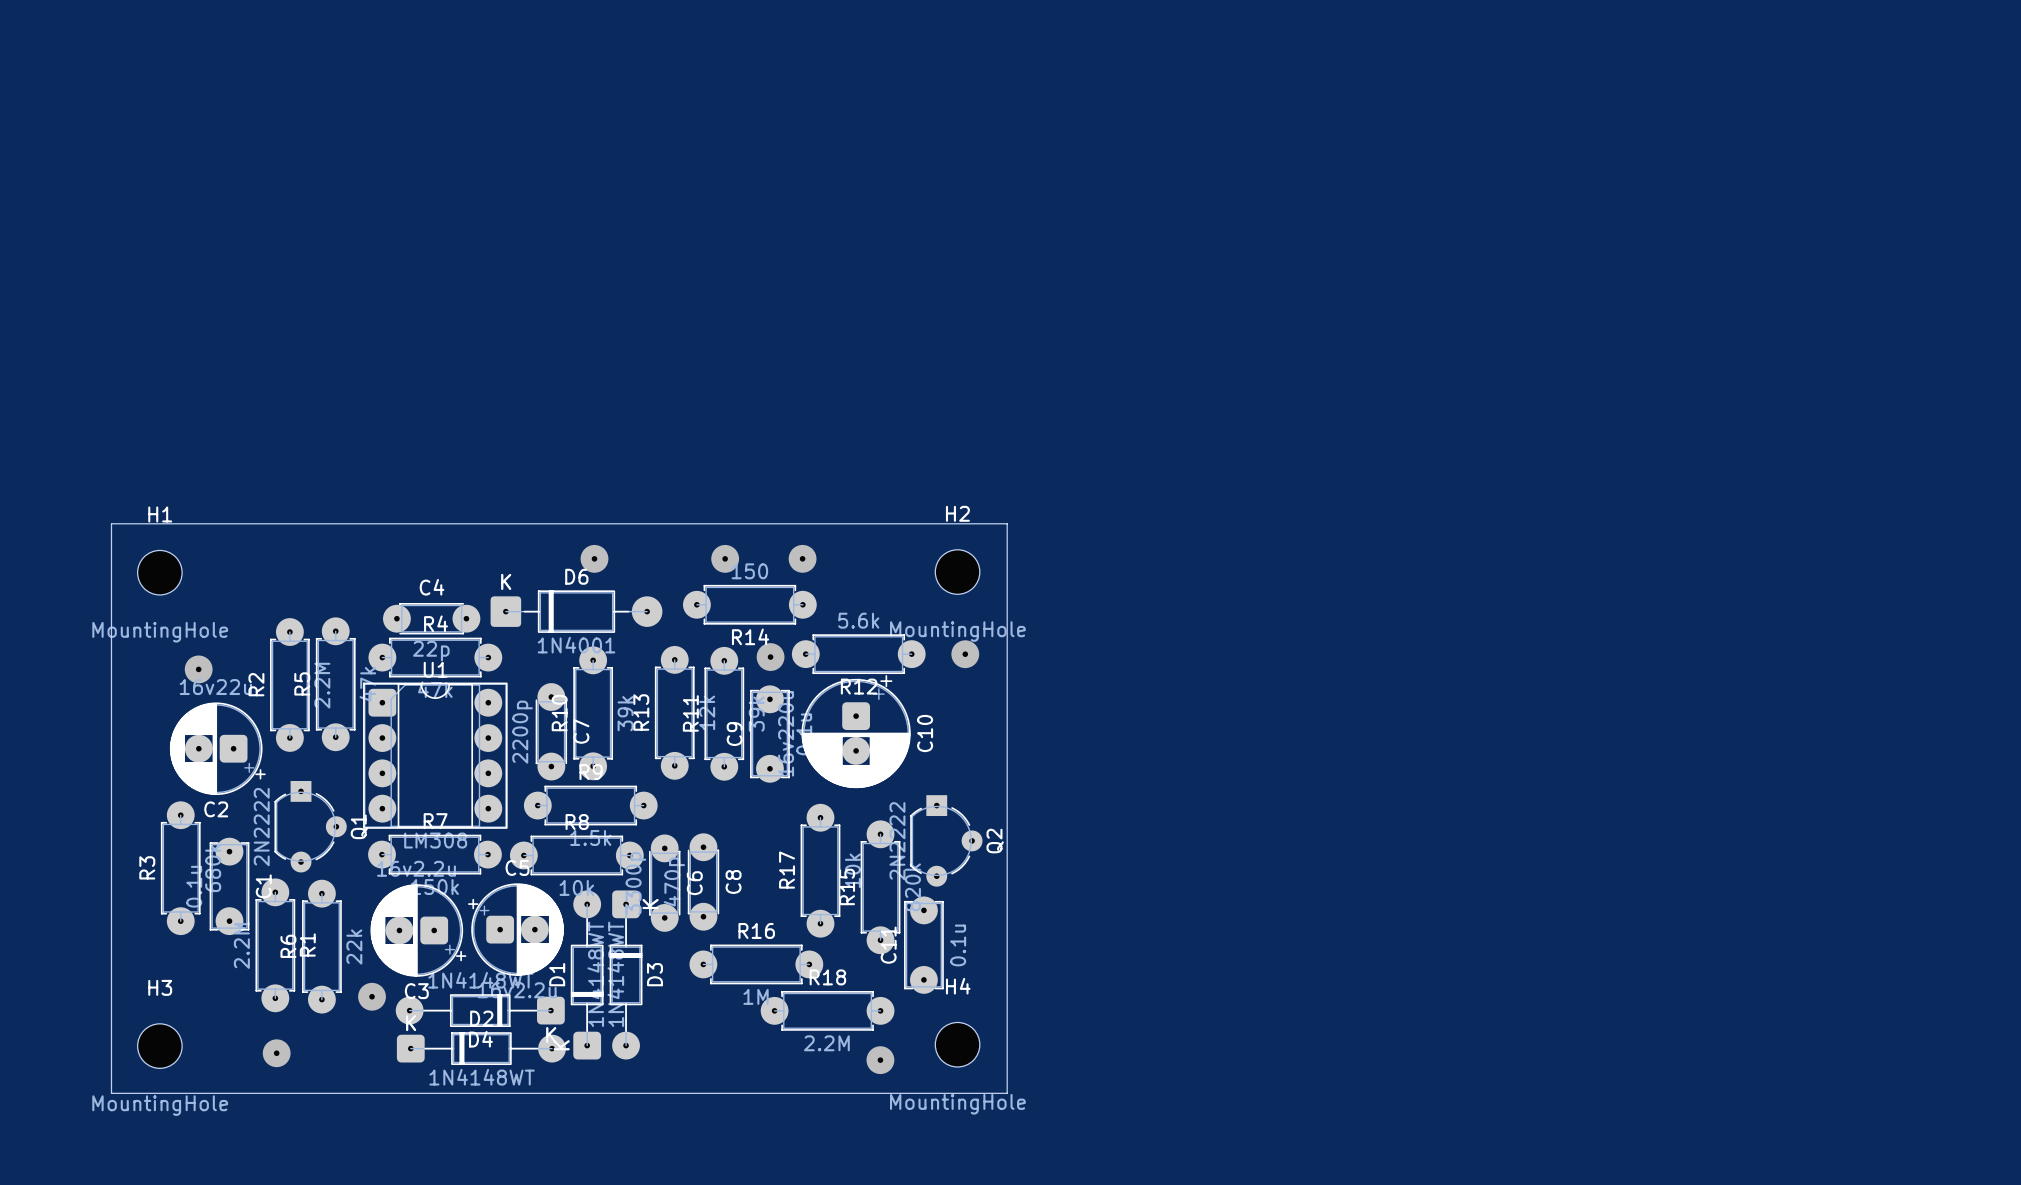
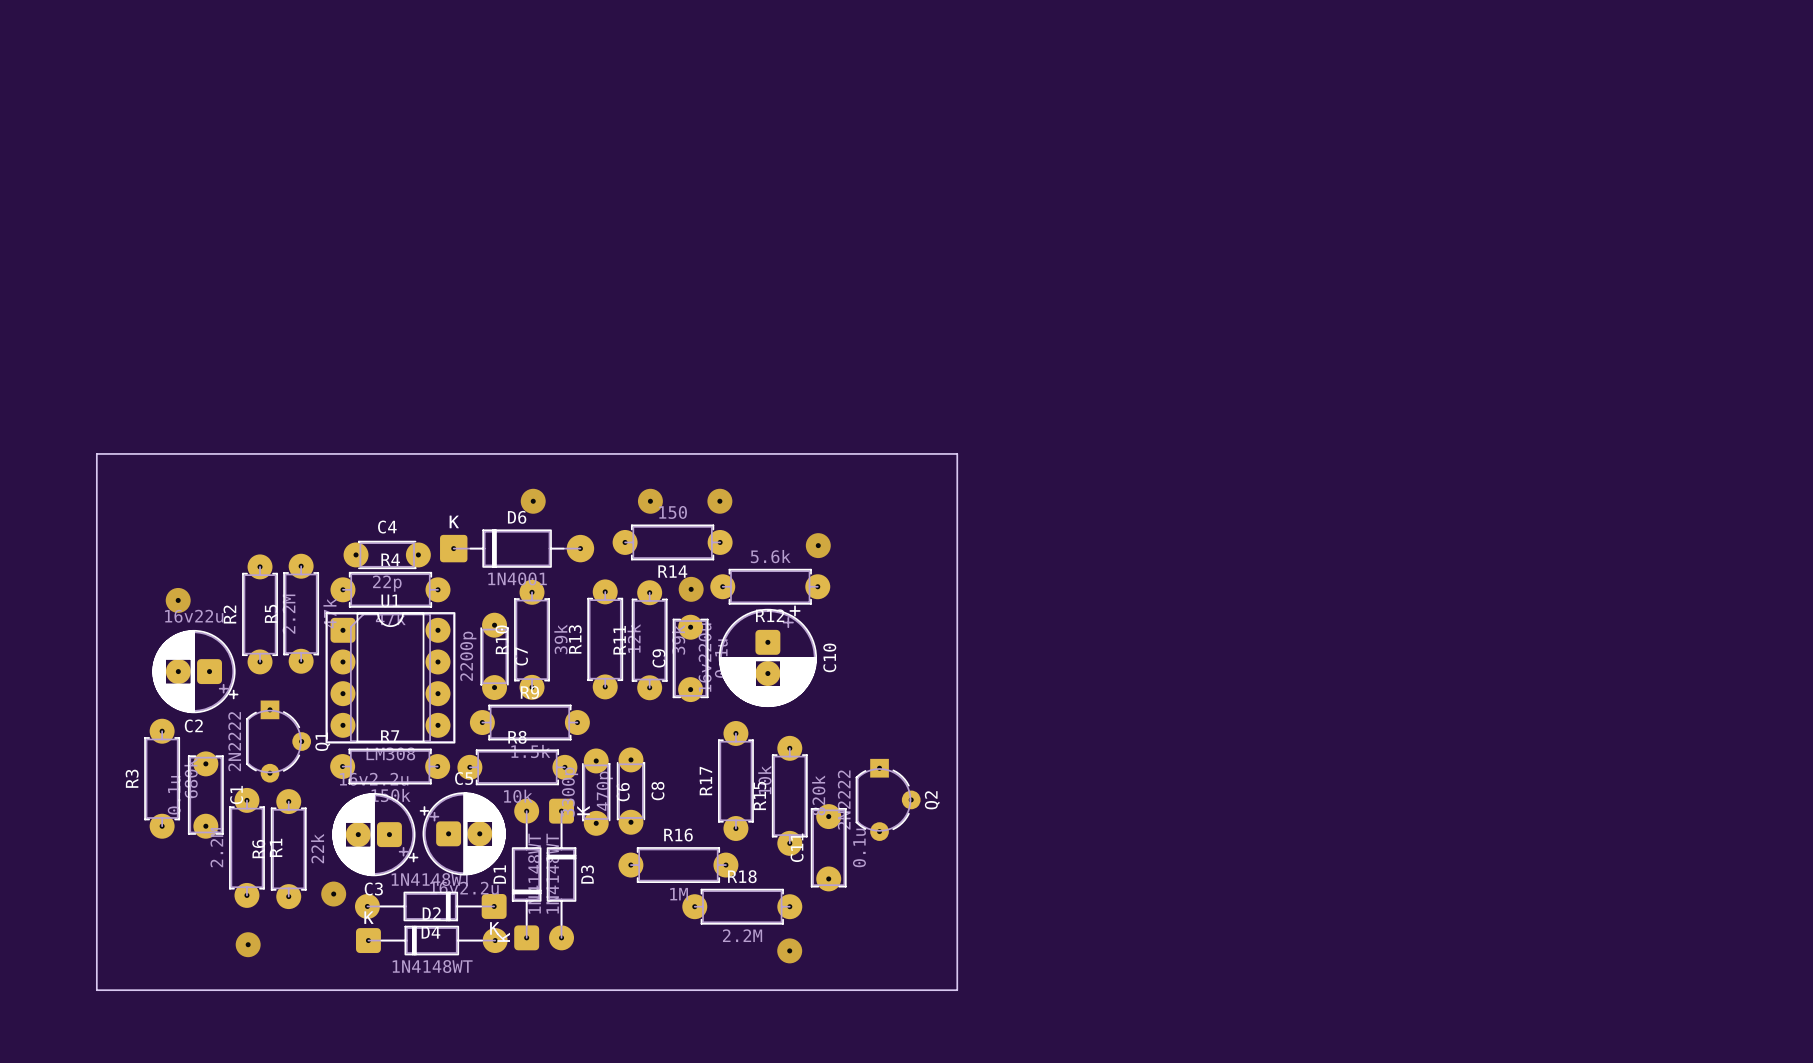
board edge: (111, 523) (1007, 523) (1007, 1093) (111, 1093) (111, 523) -> (96, 453) (96, 990) (957, 990) (957, 453) (96, 453)
H1: MountingHole (159, 572) -> none
H2: MountingHole (957, 572) -> none
via position: (965, 654) -> (818, 545)
Q2 position: (946, 840) -> (888, 799)
H4: MountingHole (957, 1044) -> none
H3: MountingHole (159, 1046) -> none

